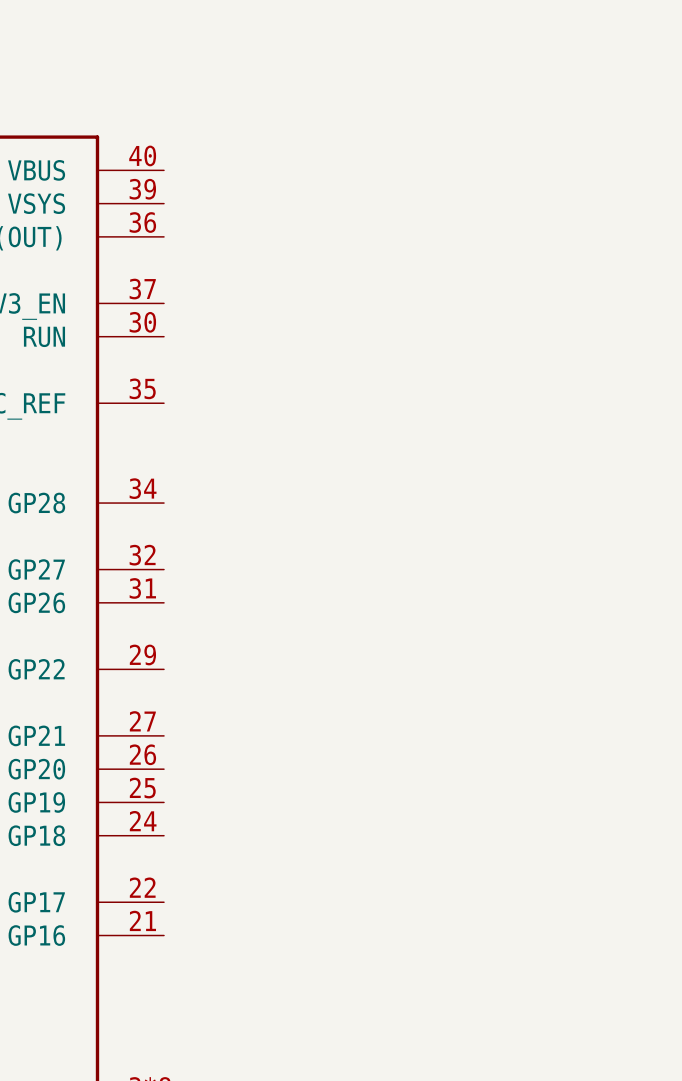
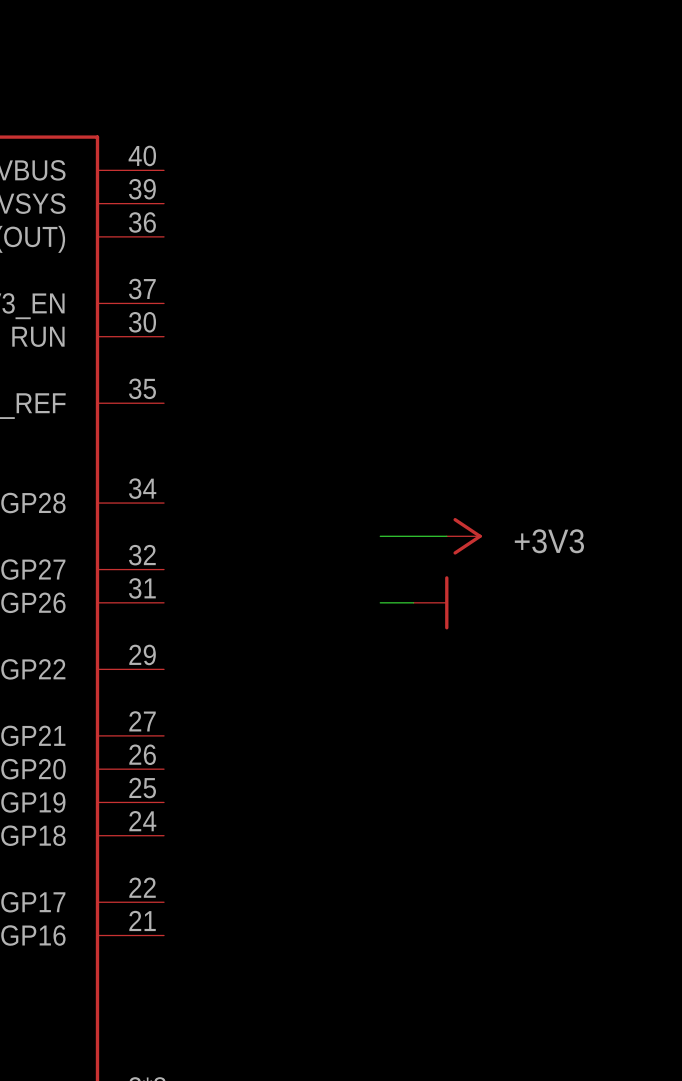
wire: none -> (380, 536) (446, 536)
power symbol: none -> +3V3 (464, 536)
wire: none -> (380, 602) (413, 602)
power symbol: none -> (431, 602)

